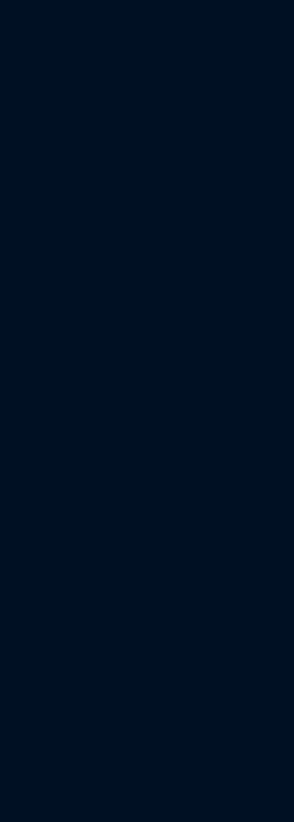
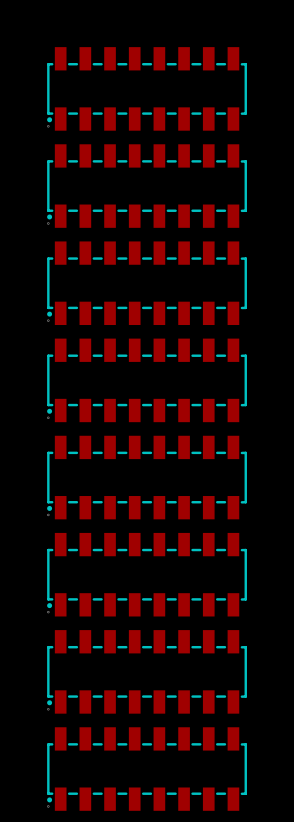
part: none -> (147, 88)
part: none -> (147, 186)
part: none -> (147, 283)
part: none -> (147, 380)
part: none -> (147, 477)
part: none -> (147, 574)
part: none -> (147, 671)
part: none -> (147, 769)

